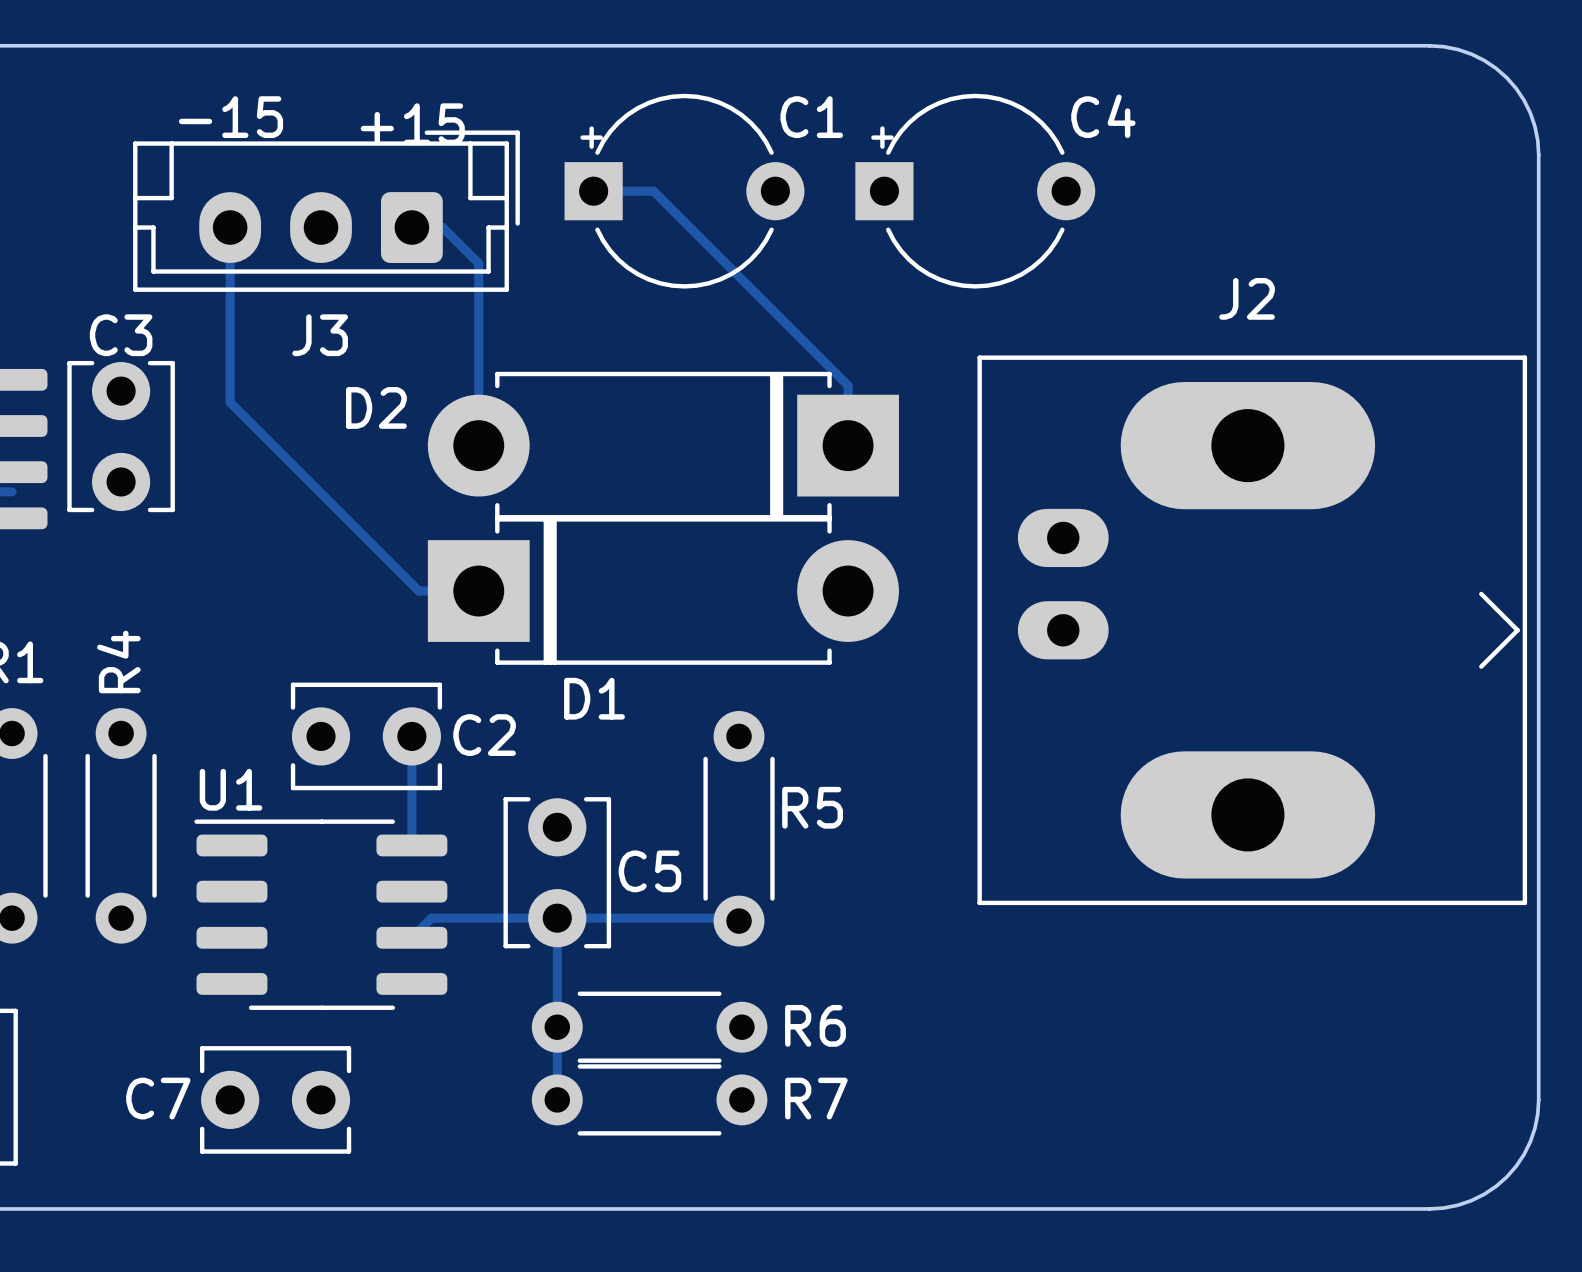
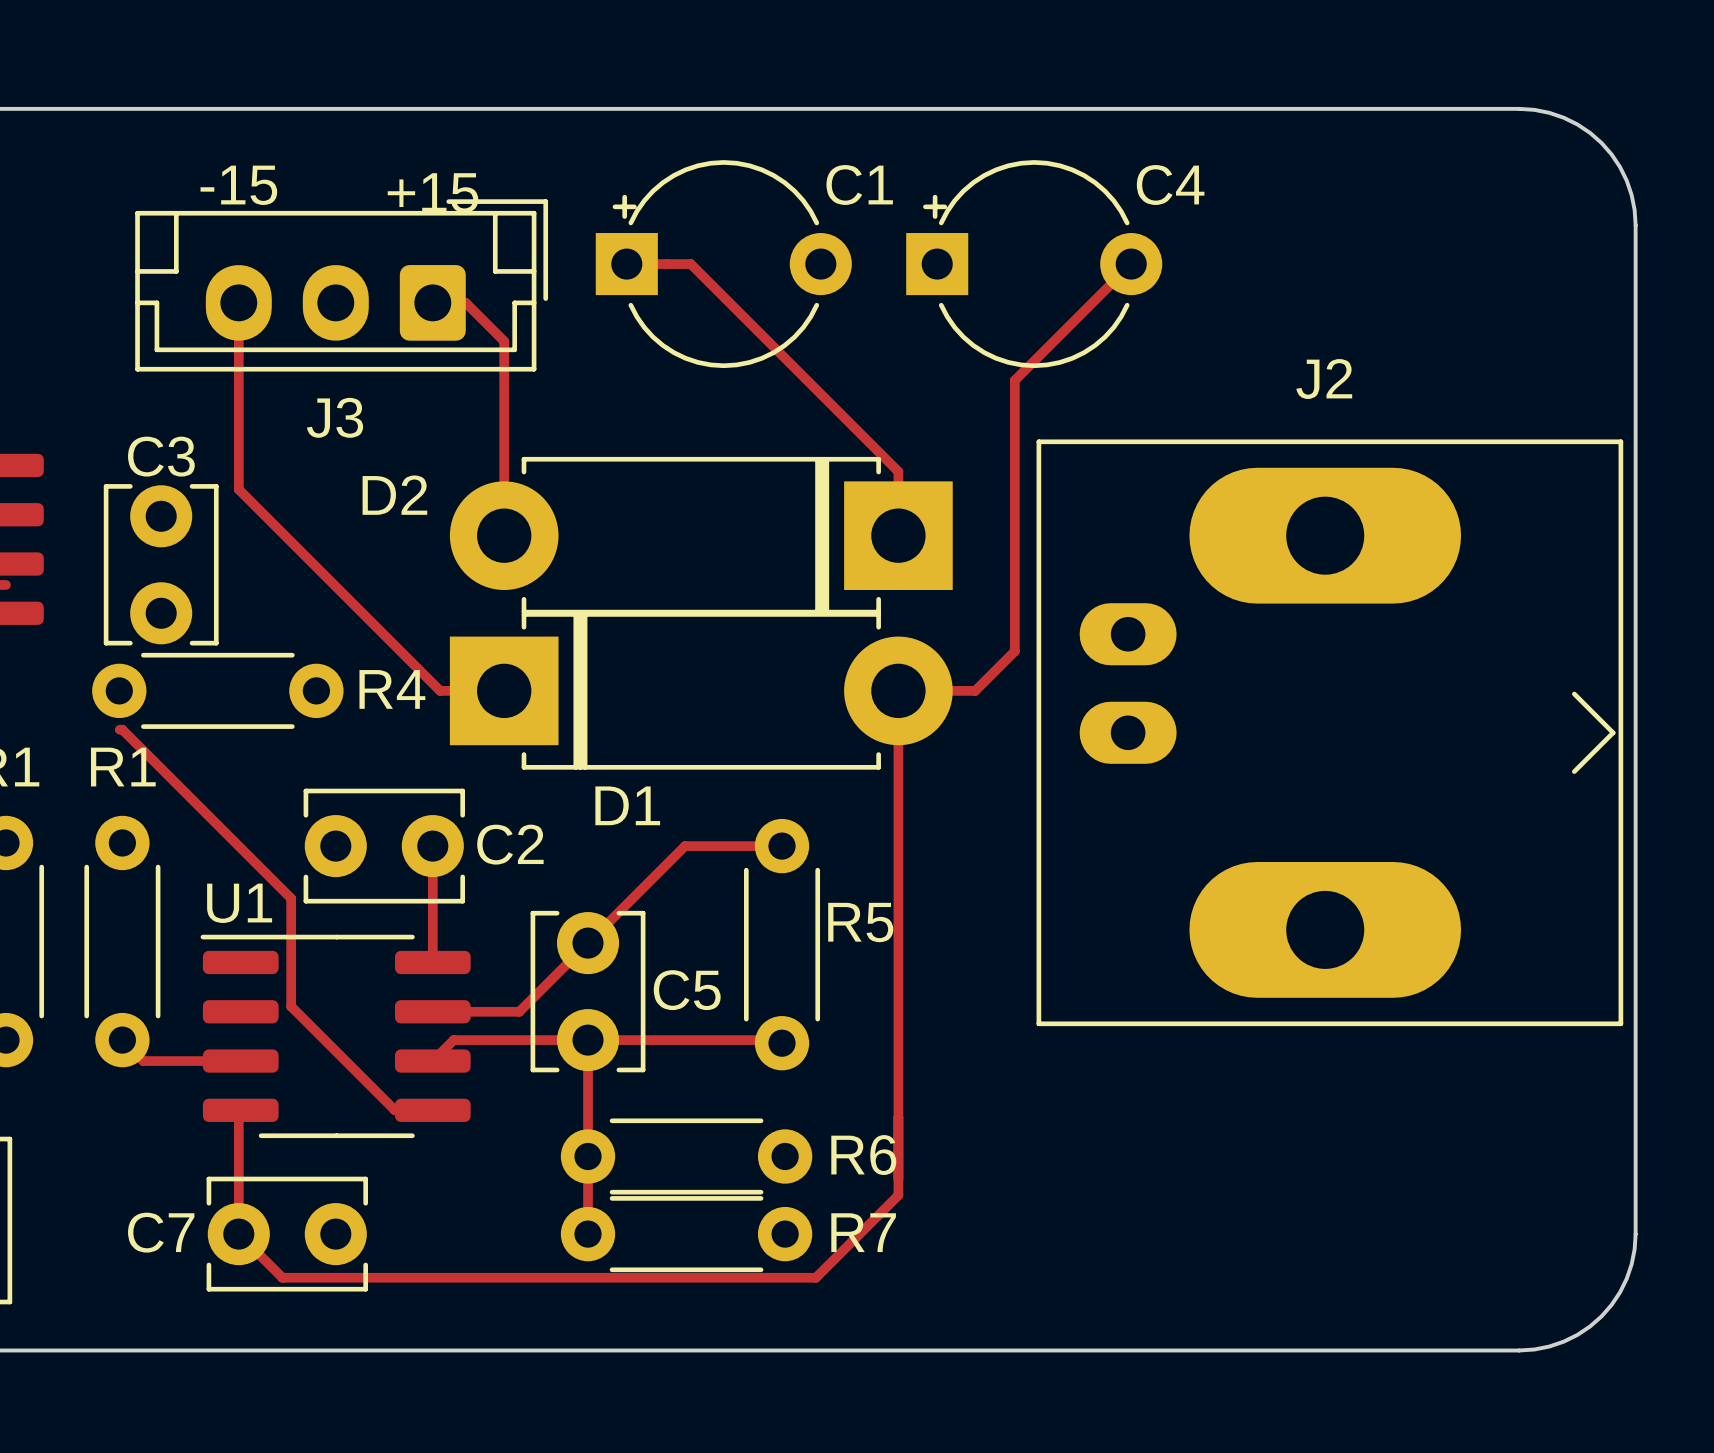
track: none -> (1131, 264) (1014, 380) (1014, 651) (975, 690) (898, 690) (898, 1195) (815, 1277) (282, 1277) (238, 1234) (238, 1112) (240, 1110)
C3 position: (121, 436) -> (161, 564)
R4: none -> (217, 690)
track: none -> (119, 729) (122, 729) (291, 898) (291, 1006) (394, 1110) (432, 1110)
R4 name: R4 (118, 661) -> R1 (123, 767)
track: none -> (782, 846) (685, 846) (519, 1011) (432, 1011)
track: none -> (122, 1040) (143, 1061) (240, 1061)

